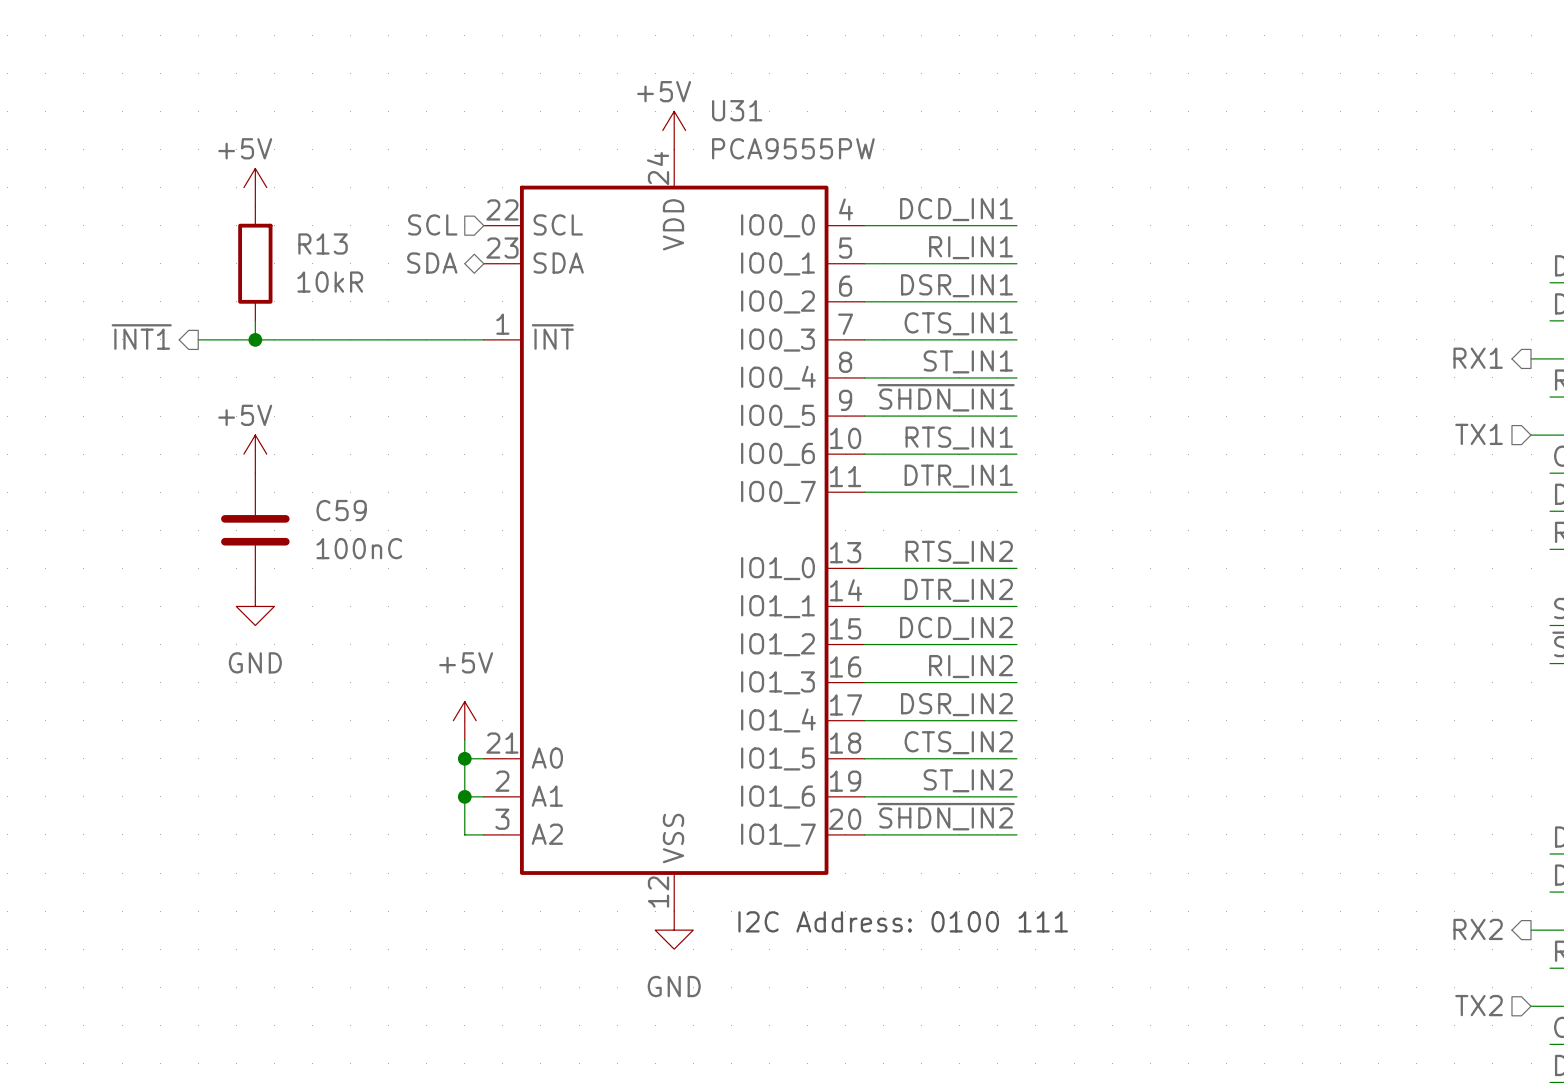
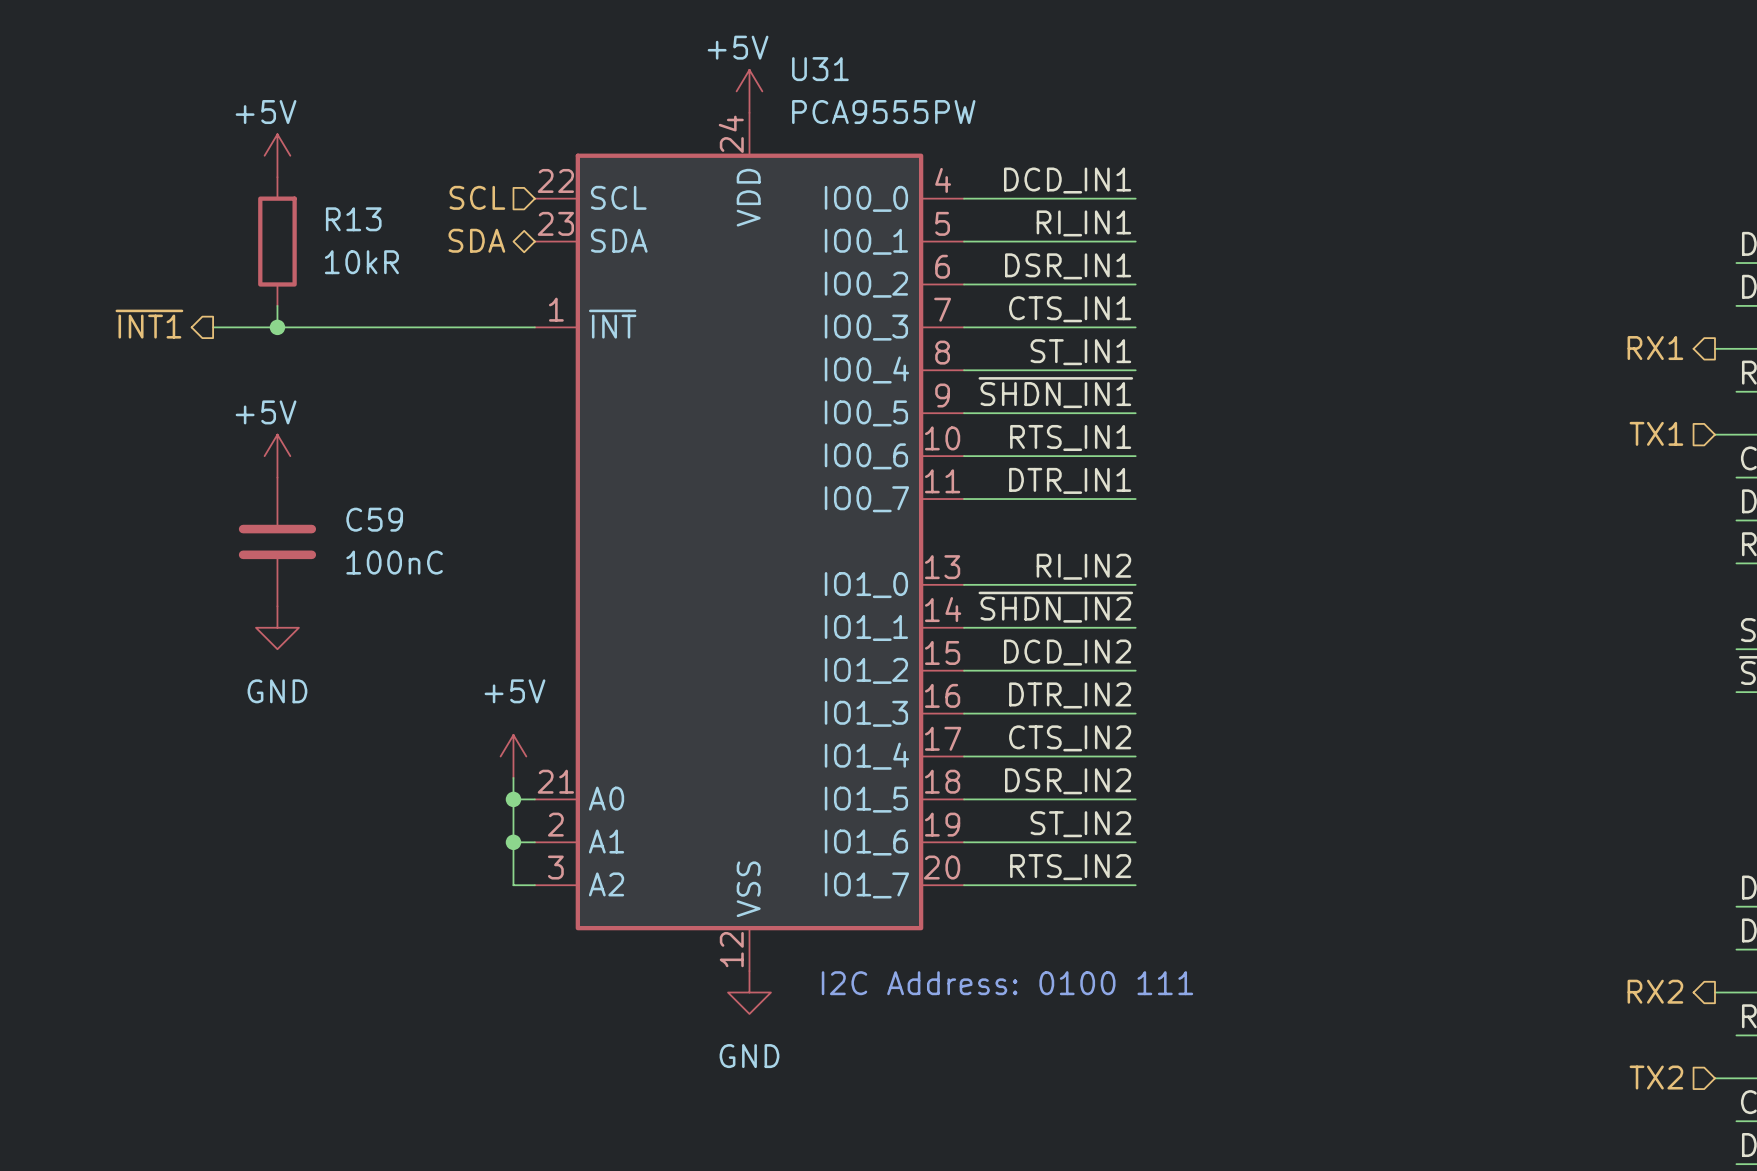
label: RTS_IN2 (959, 552) -> RI_IN2 (1083, 566)
label: DTR_IN2 (958, 590) -> ~{SHDN_IN2} (1055, 607)
label: RI_IN2 (971, 666) -> DTR_IN2 (1070, 695)
label: DSR_IN2 (956, 704) -> CTS_IN2 (1070, 738)
label: CTS_IN2 (958, 742) -> DSR_IN2 (1068, 781)
label: ~{SHDN_IN2} (946, 816) -> RTS_IN2 (1070, 867)

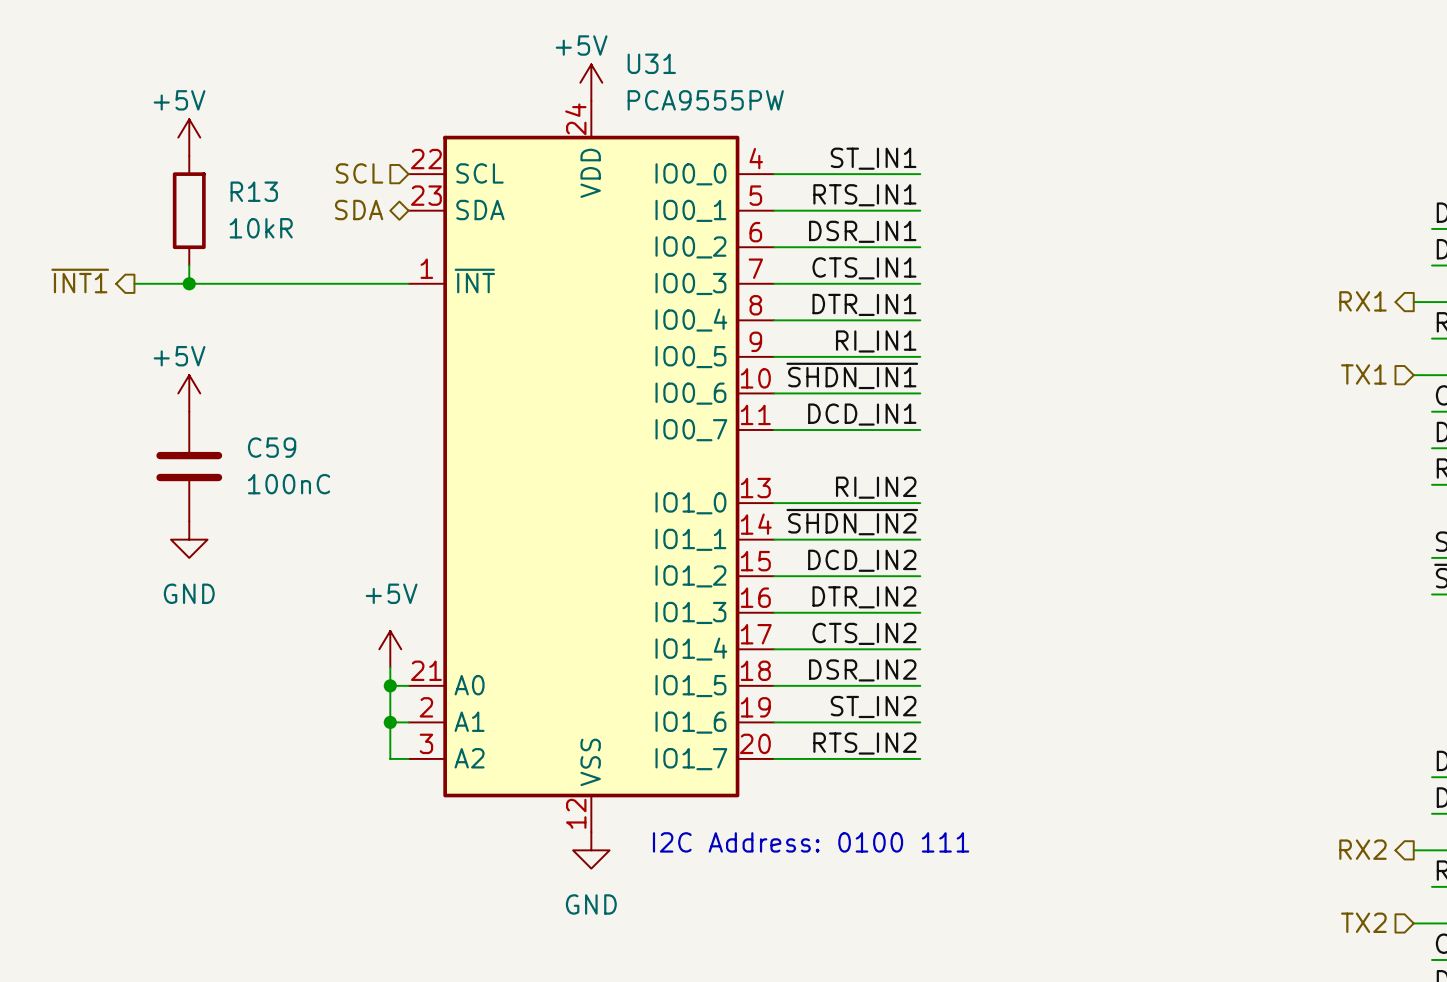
label: DCD_IN1 (1067, 180) -> ST_IN1 (873, 158)
label: RI_IN1 (1083, 223) -> RTS_IN1 (864, 195)
label: ST_IN1 (1080, 352) -> DTR_IN1 (864, 304)
label: ~{SHDN_IN1} (1055, 392) -> RI_IN1 (876, 341)
label: RTS_IN1 (1070, 437) -> ~{SHDN_IN1} (852, 375)
label: DTR_IN1 (1070, 480) -> DCD_IN1 (862, 414)

